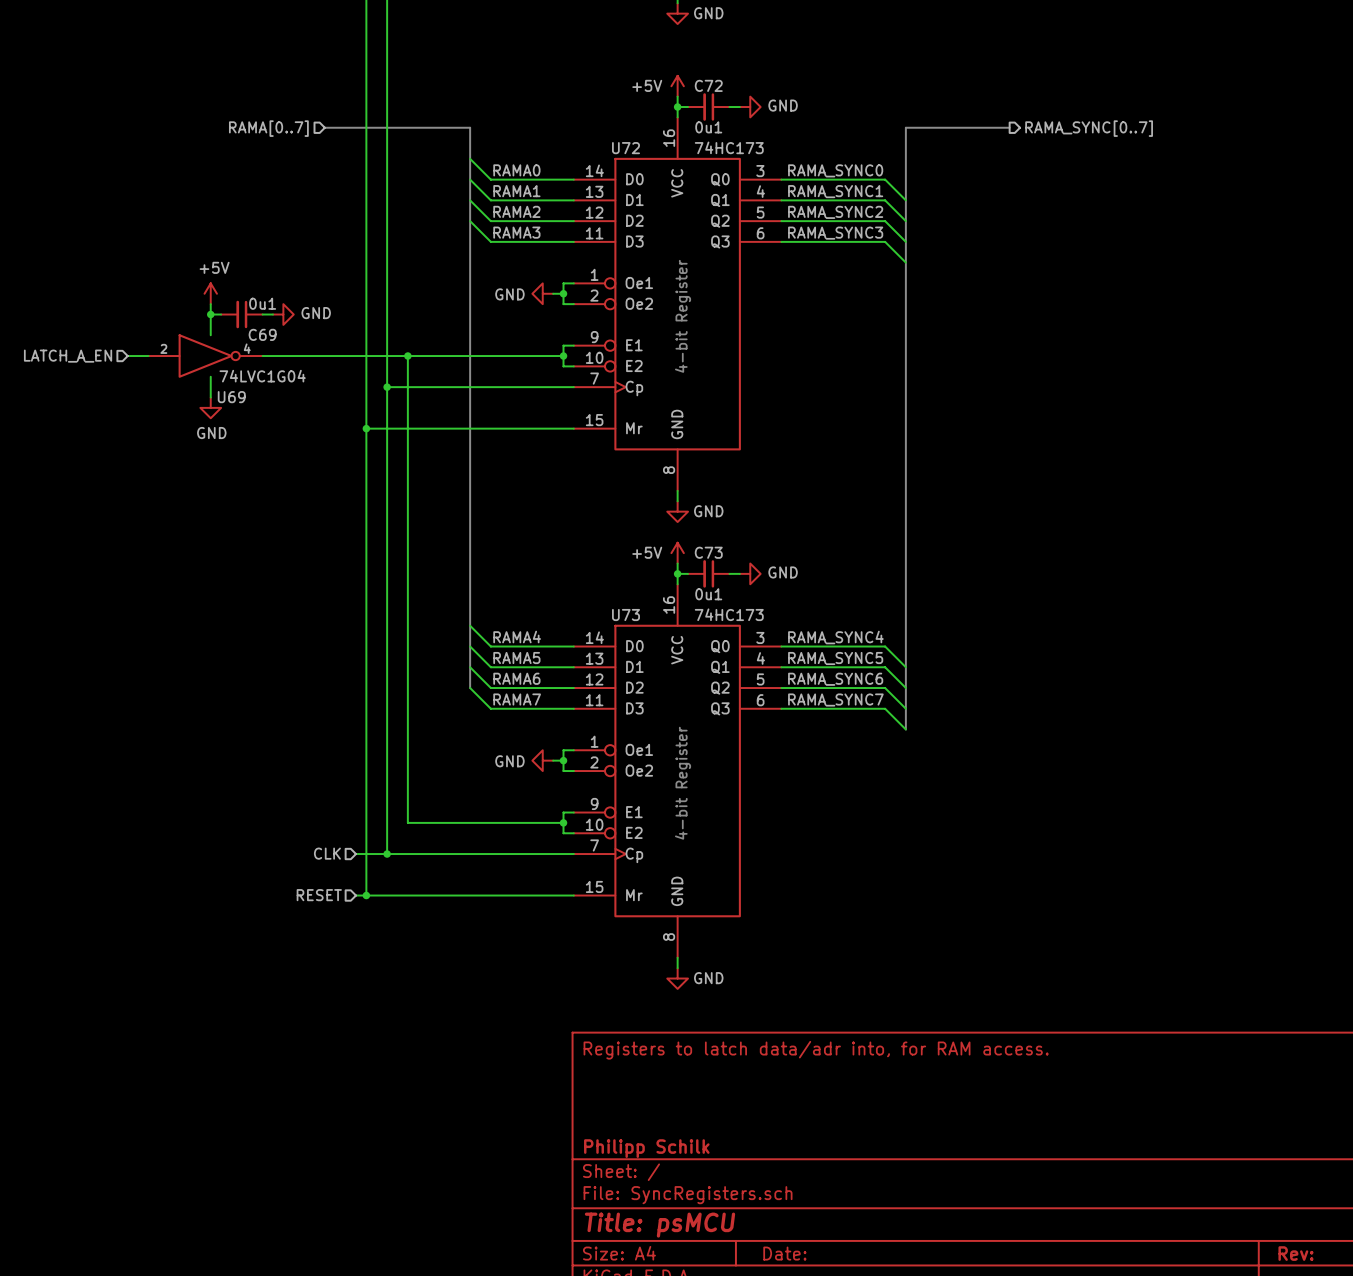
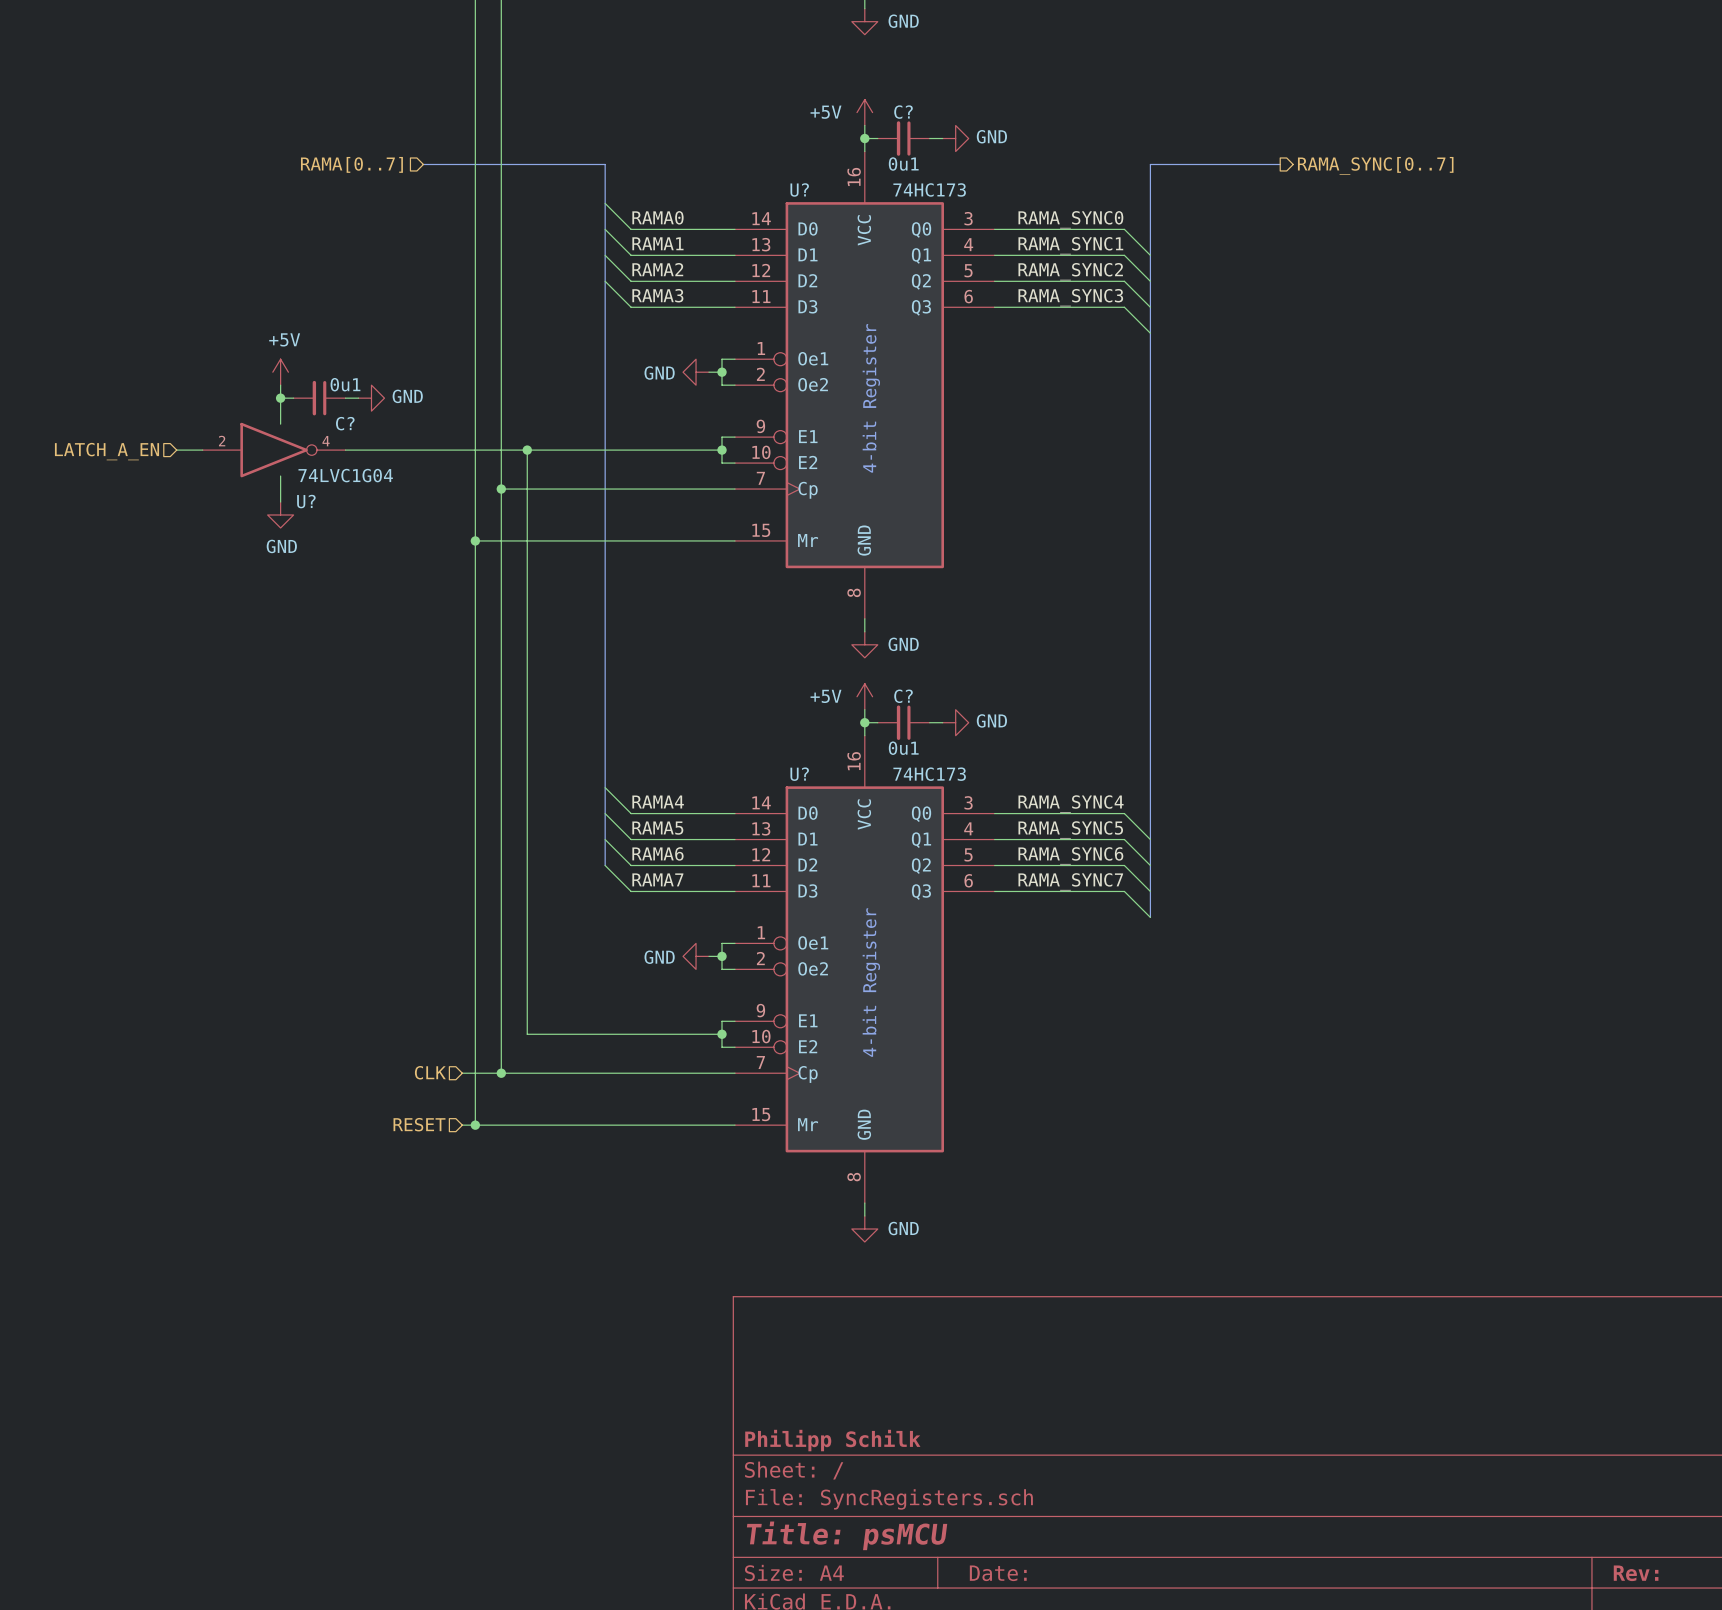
C72 name: C72 (708, 85) -> C? (903, 112)
U72 name: U72 (626, 148) -> U? (799, 189)
C69 name: C69 (262, 334) -> C? (345, 423)
U69 name: U69 (231, 397) -> U? (306, 501)
C73 name: C73 (708, 552) -> C? (903, 696)
U73 name: U73 (626, 615) -> U? (799, 774)
title block: Registers to latch data/adr into, for RAM access. (816, 1050) -> none

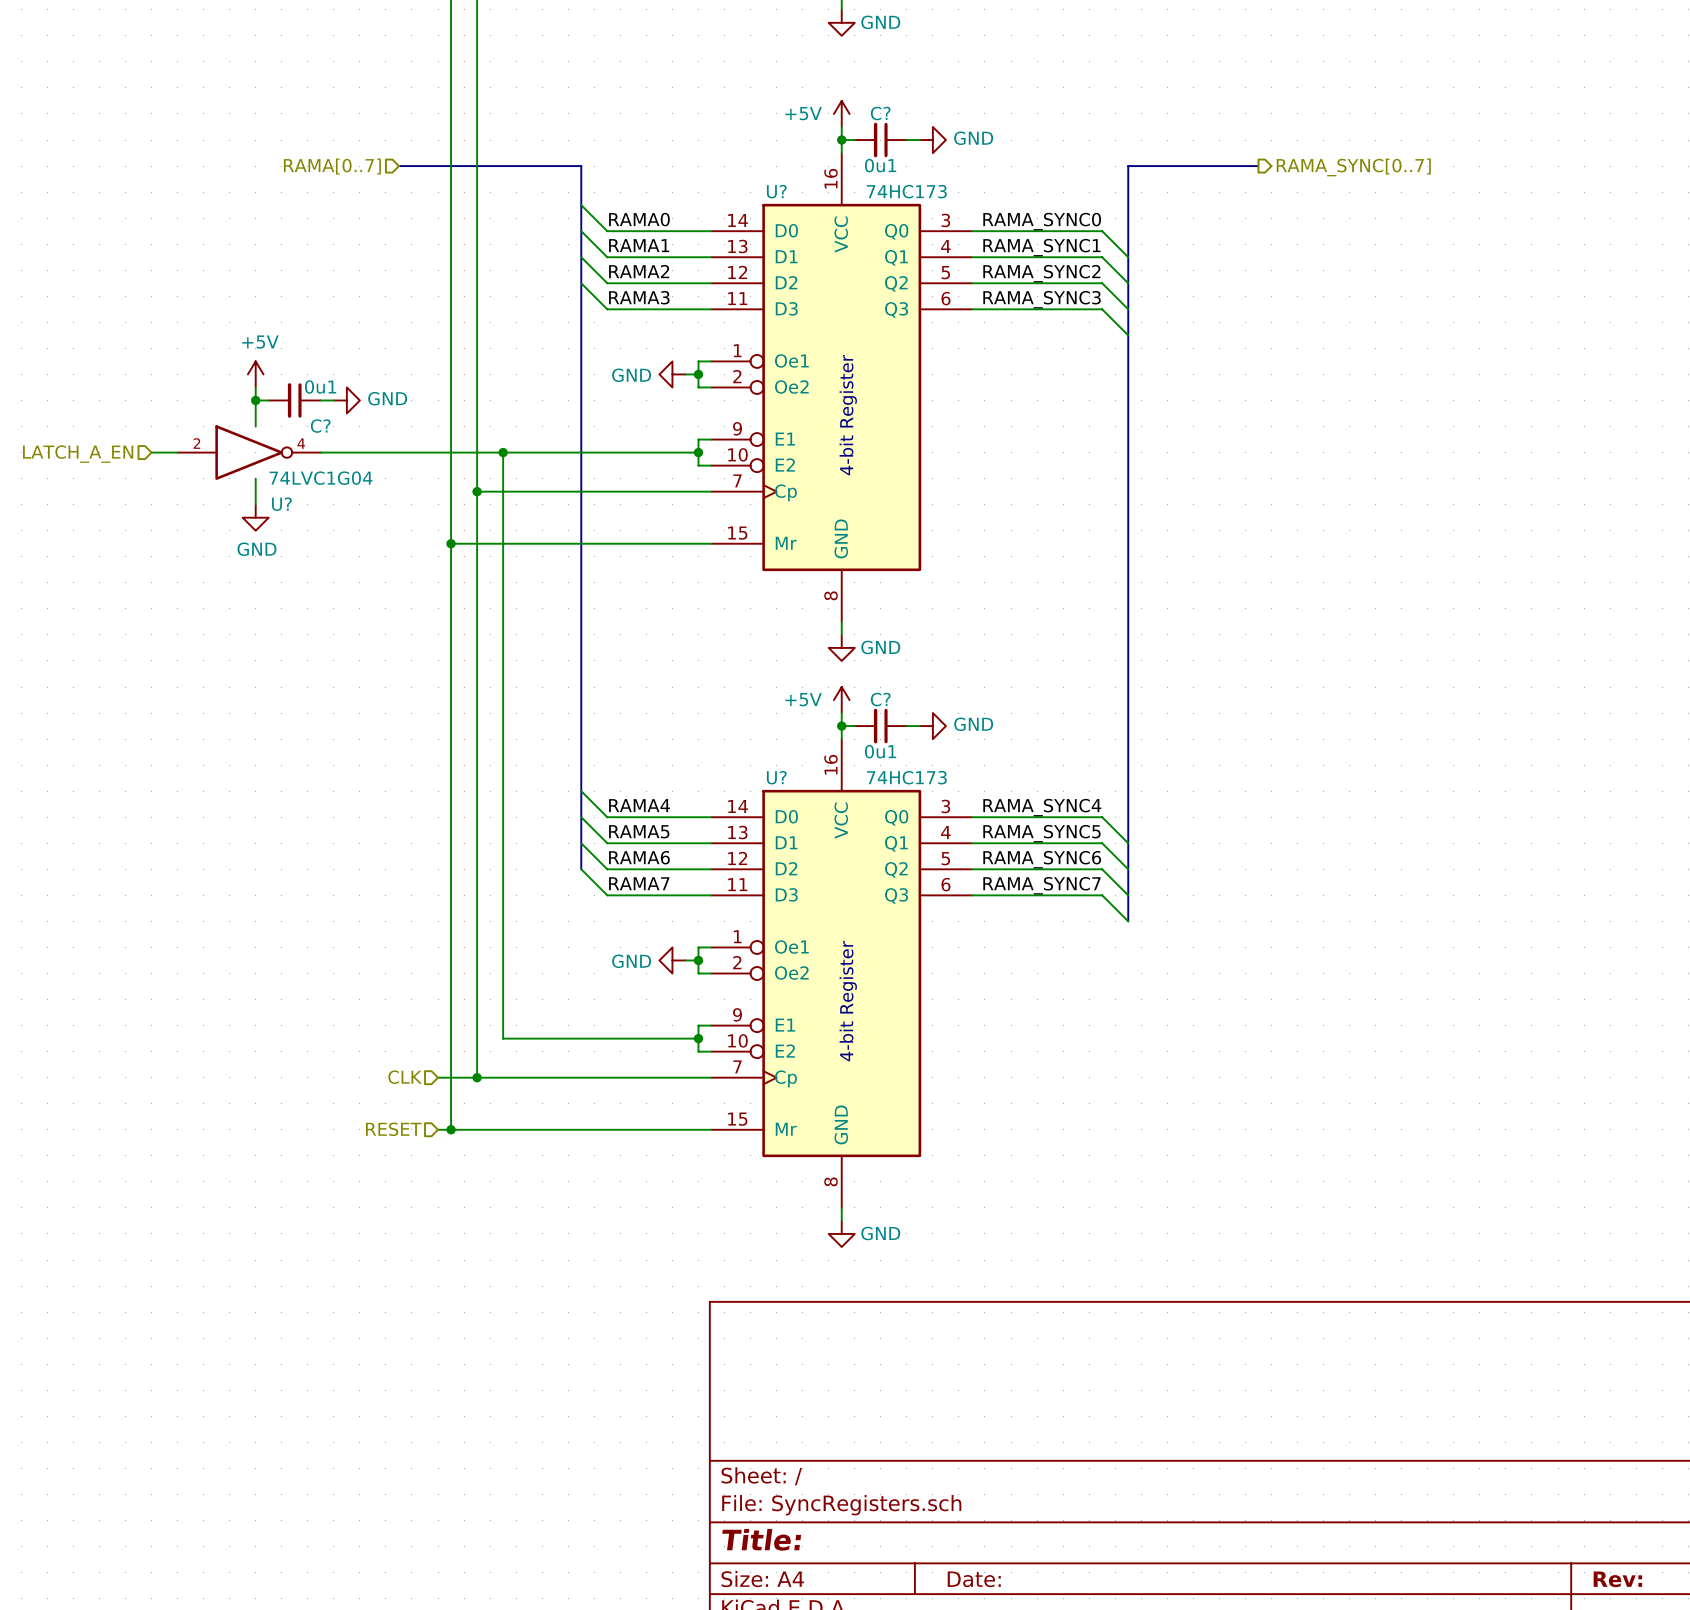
title block: Philipp Schilk (832, 1440) -> none
title block: Title: psMCU (847, 1535) -> Title: (761, 1539)

